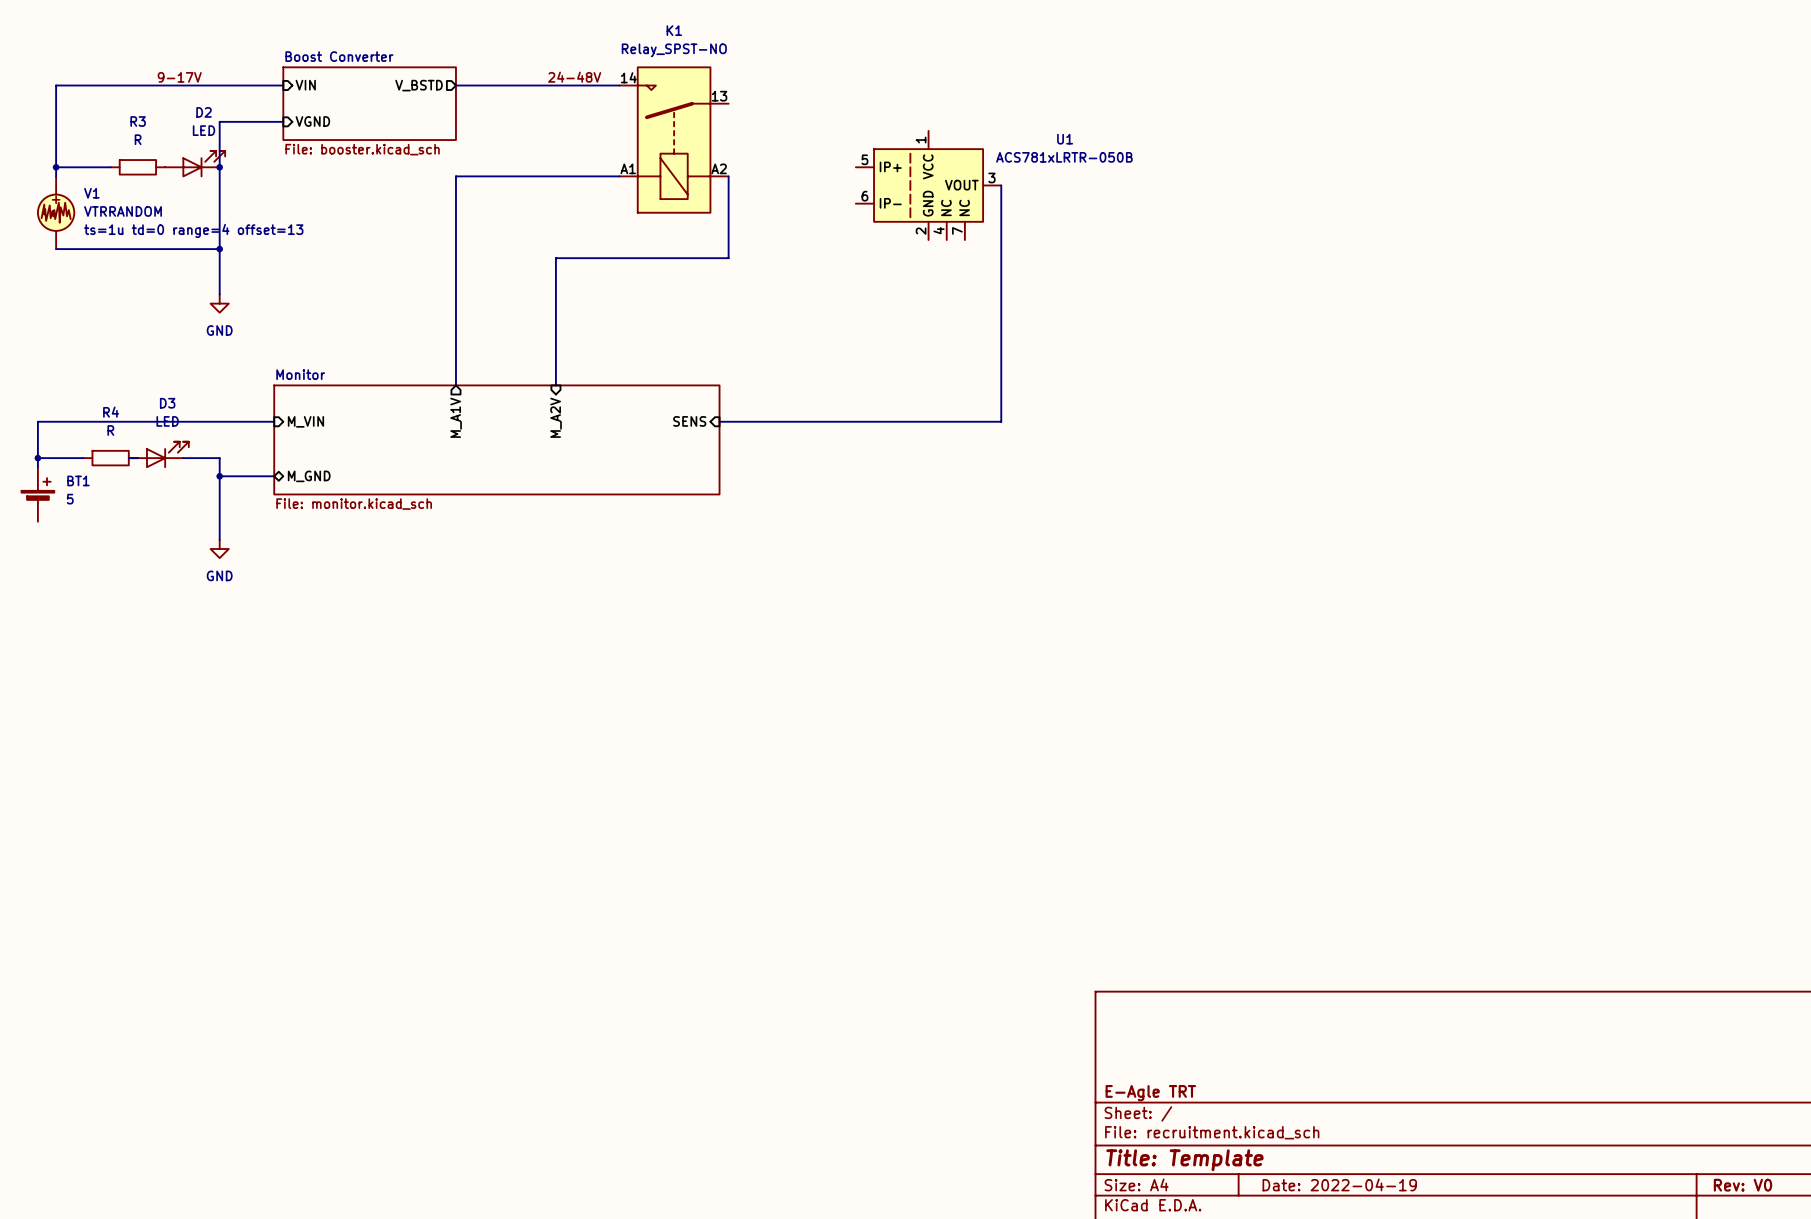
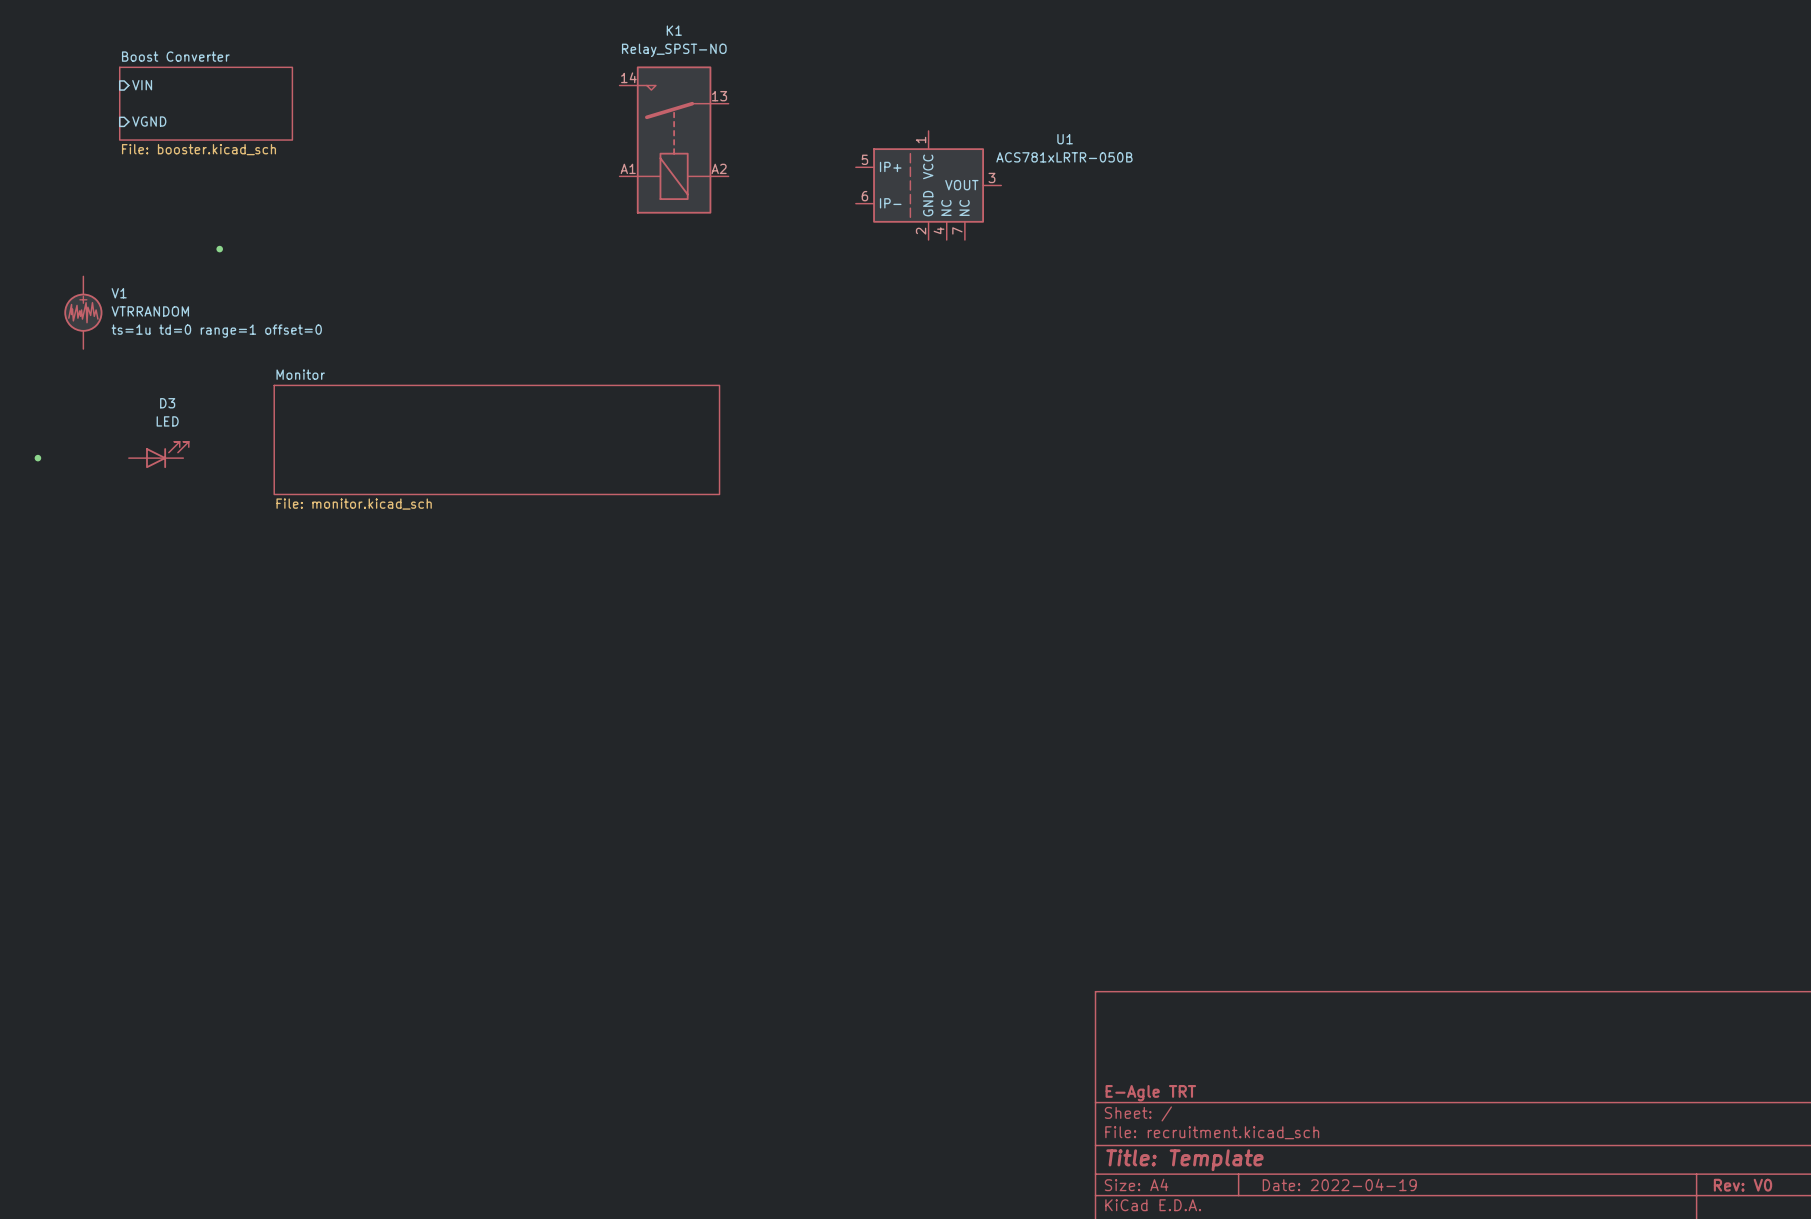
label: 9-17V (179, 77) -> none
label: 24-48V (574, 77) -> none
wire: (283, 85) (56, 85) (56, 176) -> none
sheet pin position: VIN (305, 85) -> VIN (142, 85)
sheet pin: V_BSTD (419, 85) -> none
wire: (455, 85) (619, 85) -> none
sheet Boost Converter position: (369, 103) -> (206, 103)
wire: (283, 121) (219, 121) (219, 294) -> none
sheet pin position: VGND (312, 121) -> VGND (149, 121)
D2: LED (195, 164) -> none
wire: (56, 167) (110, 167) -> none
junction: (56, 167) -> none
R3: R (137, 167) -> none
junction: (219, 167) -> none
wire: (619, 176) (455, 176) (455, 385) -> none
wire: (728, 176) (728, 258) (555, 258) (555, 385) -> none
wire: (1001, 185) (1001, 421) (719, 421) -> none
V1 position: (56, 212) -> (83, 312)
V1 text: ts=1u td=0 range=4 offset=13 (193, 230) -> ts=1u td=0 range=1 offset=0 (216, 331)
wire: (56, 249) (219, 249) -> none
power symbol: GND (219, 303) -> none
sheet pin: M_A1V (456, 417) -> none
sheet pin: M_A2V (556, 417) -> none
wire: (274, 421) (37, 421) (37, 467) -> none
sheet pin: M_VIN (305, 421) -> none
sheet pin: SENS (689, 421) -> none
wire: (37, 458) (83, 458) -> none
R4: R (110, 458) -> none
wire: (183, 458) (219, 458) (219, 539) -> none
wire: (219, 476) (274, 476) -> none
junction: (219, 476) -> none
sheet pin: M_GND (309, 476) -> none
BT1: 5 (37, 494) -> none
power symbol: GND (219, 548) -> none

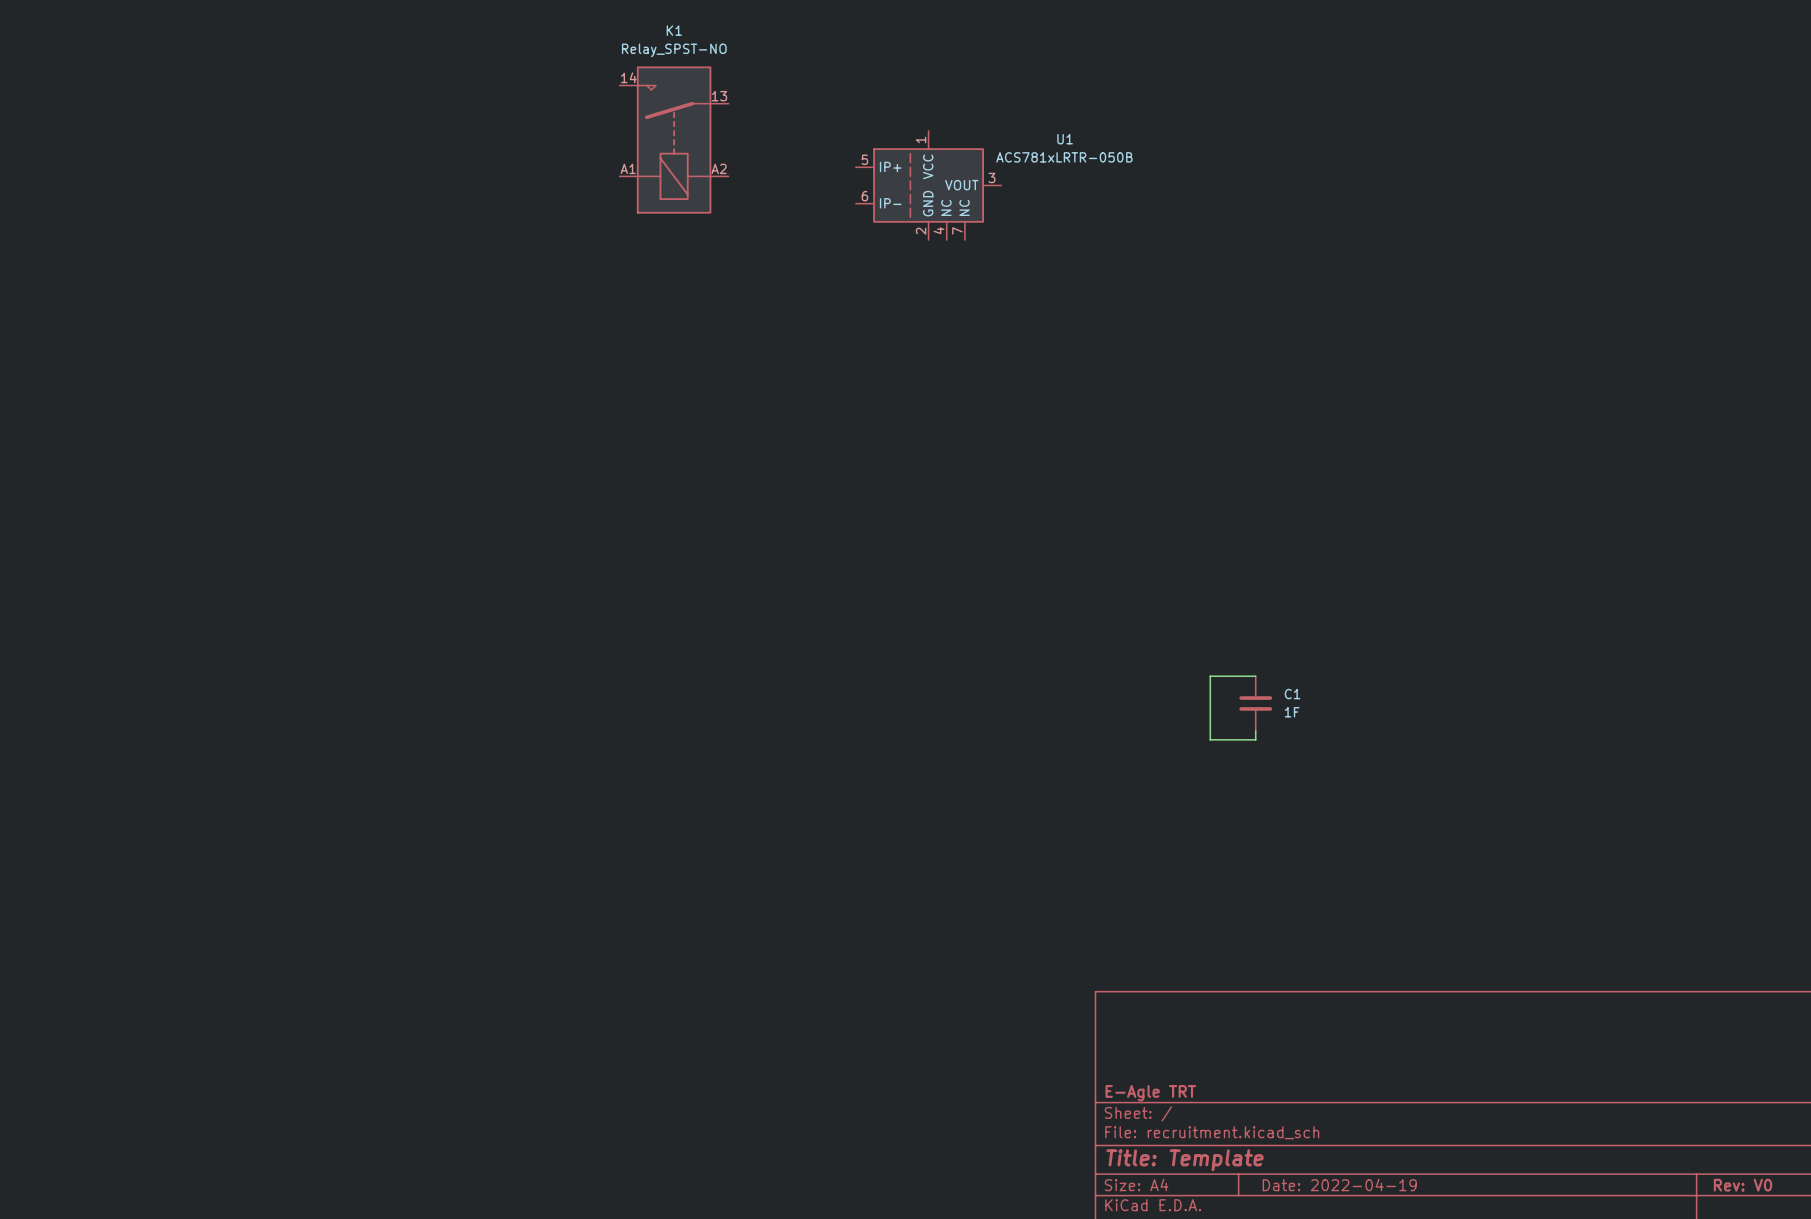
sheet pin: VIN (142, 85) -> none
sheet Boost Converter: File: booster.kicad_sch (206, 103) -> none
sheet pin: VGND (149, 121) -> none
junction: (219, 249) -> none
V1: VTRRANDOM (83, 312) -> none
sheet Monitor: File: monitor.kicad_sch (496, 439) -> none
D3: LED (158, 454) -> none
junction: (37, 458) -> none
wire: none -> (1255, 676) (1210, 676) (1210, 739) (1255, 739) (1255, 730)
C1: none -> 1F (1255, 703)

